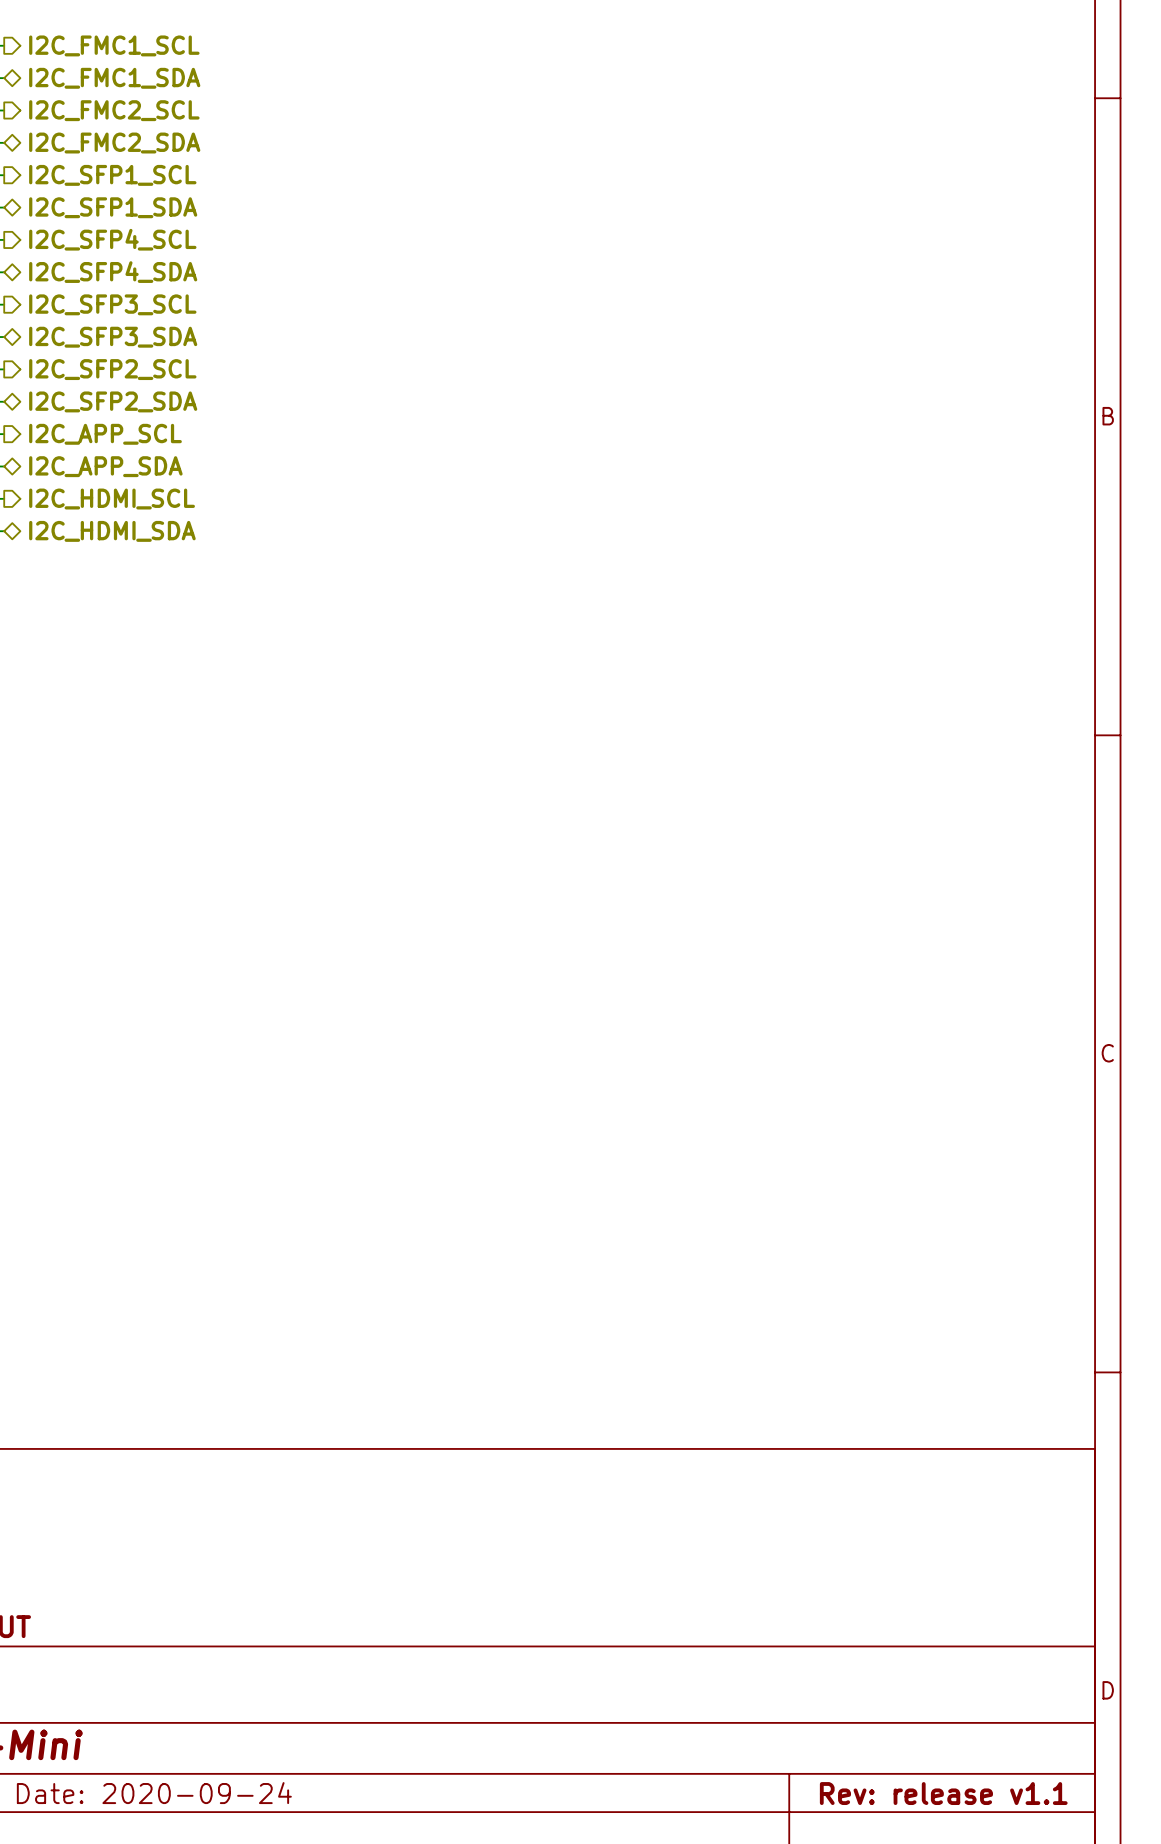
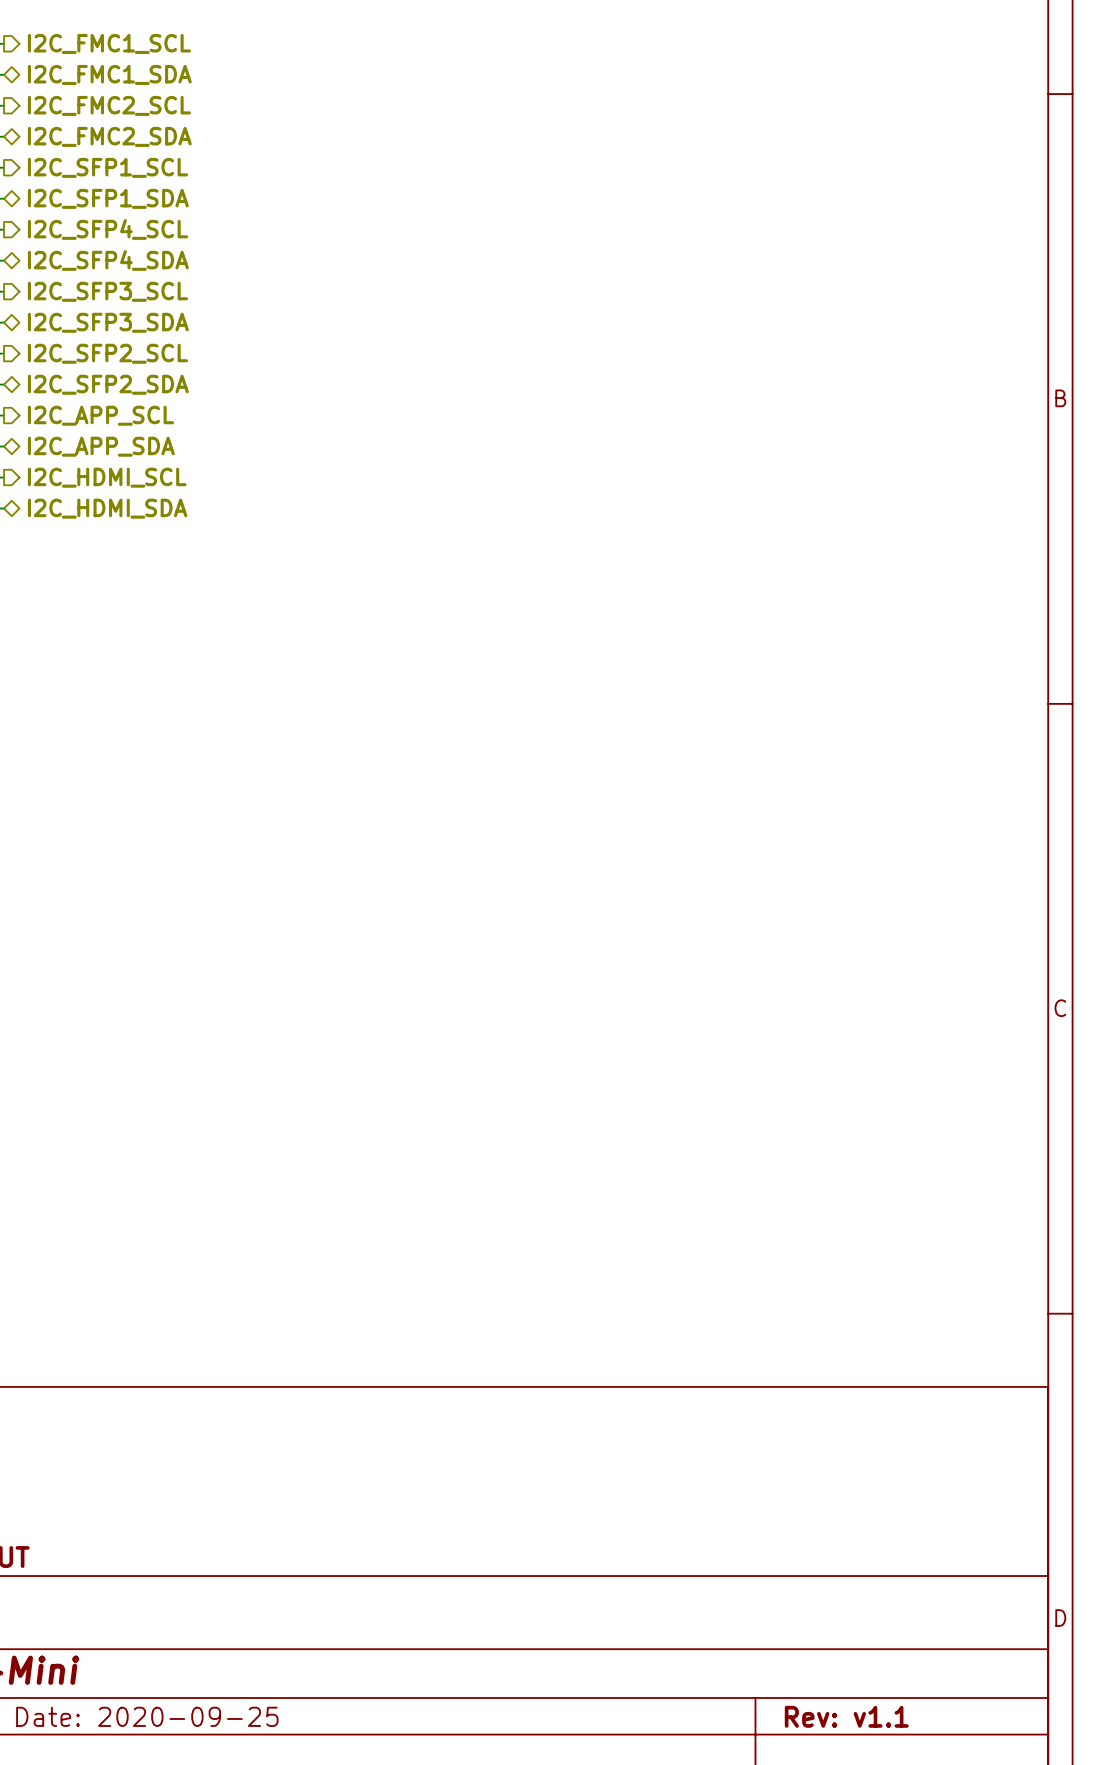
title block: Date: 2020-09-24 (154, 1793) -> Date: 2020-09-25 (147, 1716)
title block: Rev: release v1.1 (943, 1793) -> Rev: v1.1 (846, 1716)

